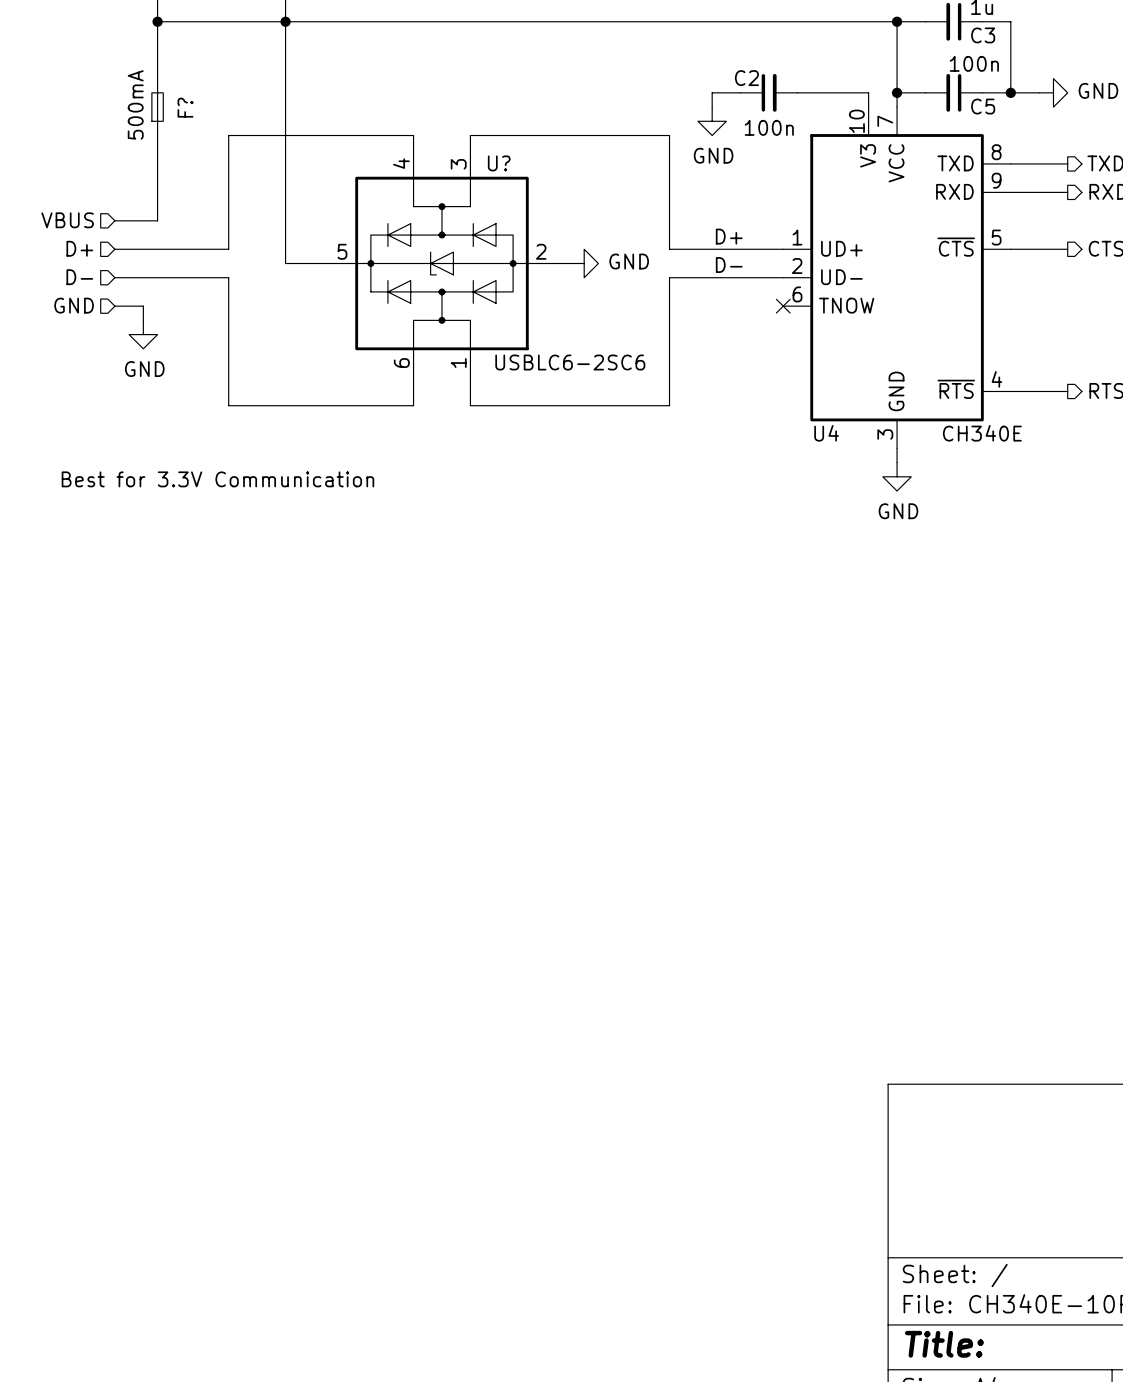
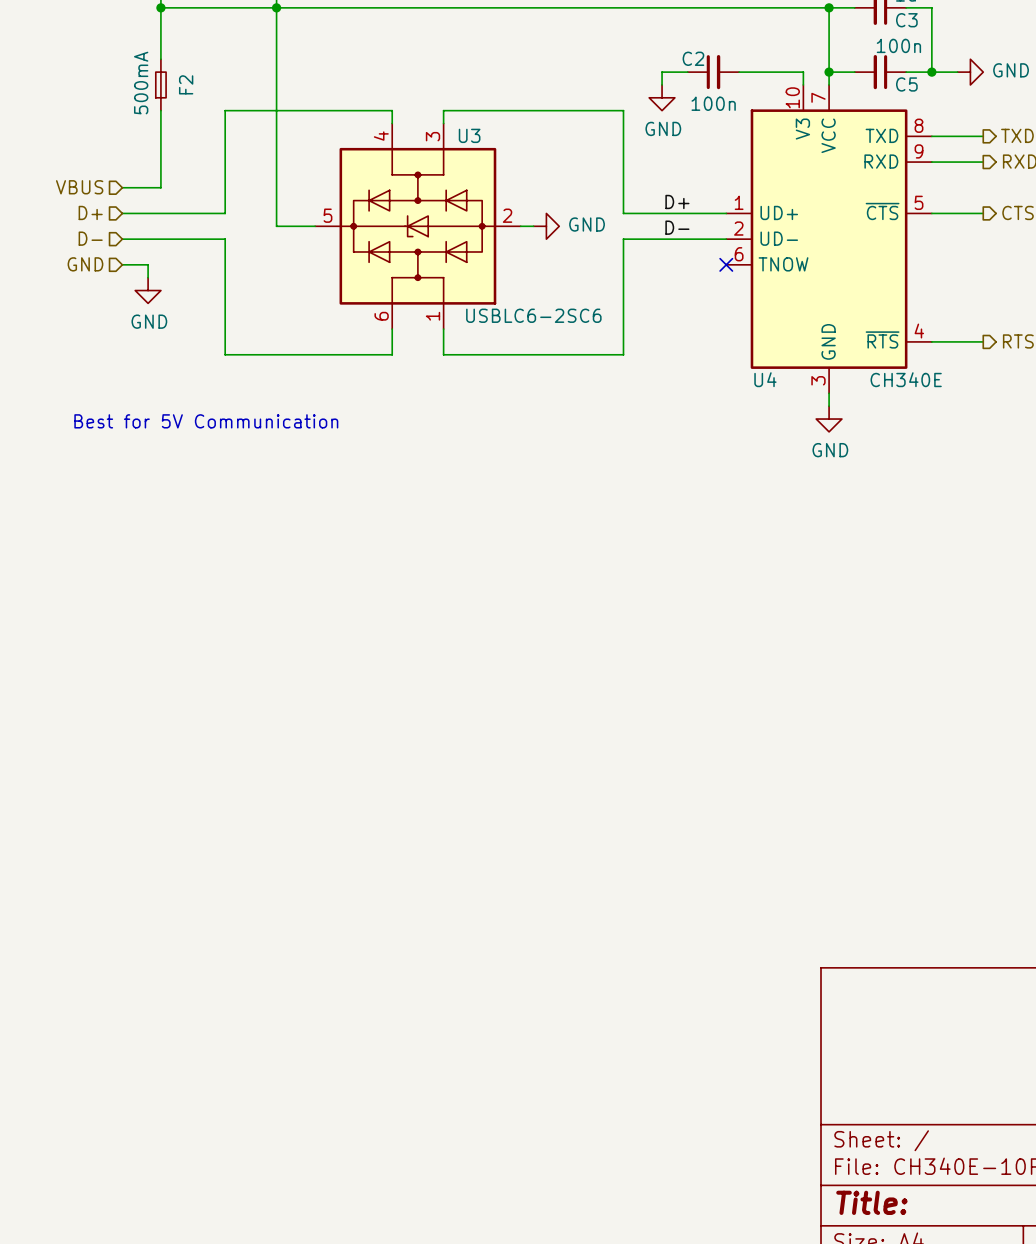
F? name: F? (185, 107) -> F2 (186, 84)
U? name: U? (499, 163) -> U3 (469, 135)
text: Best for 3.3V Communication (217, 479) -> Best for 5V Communication (206, 421)

